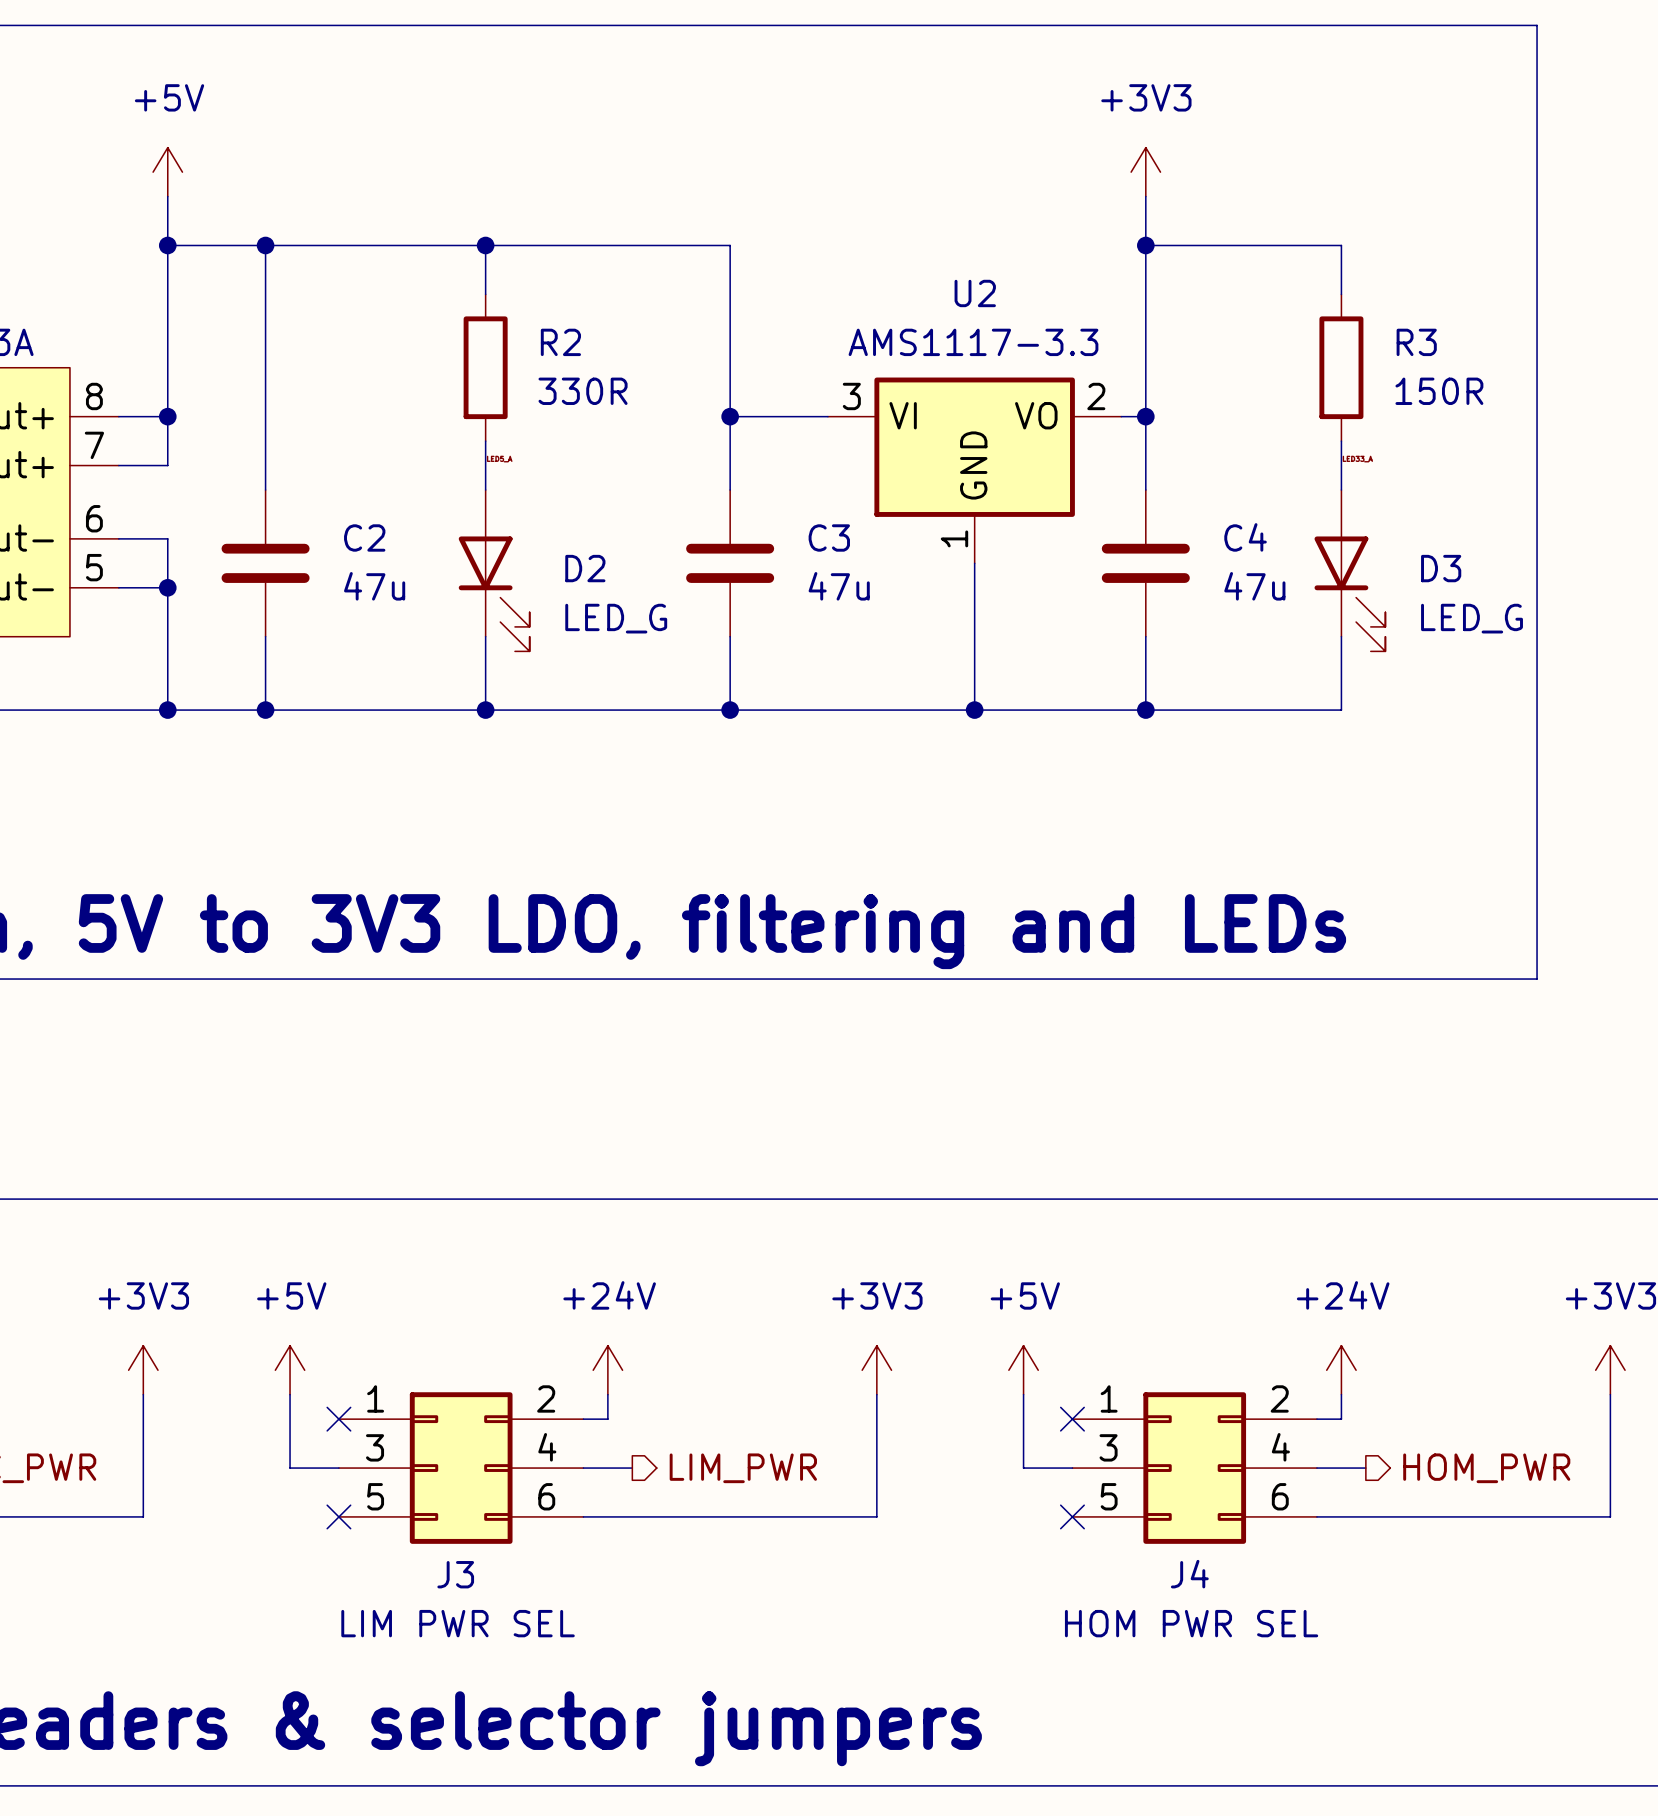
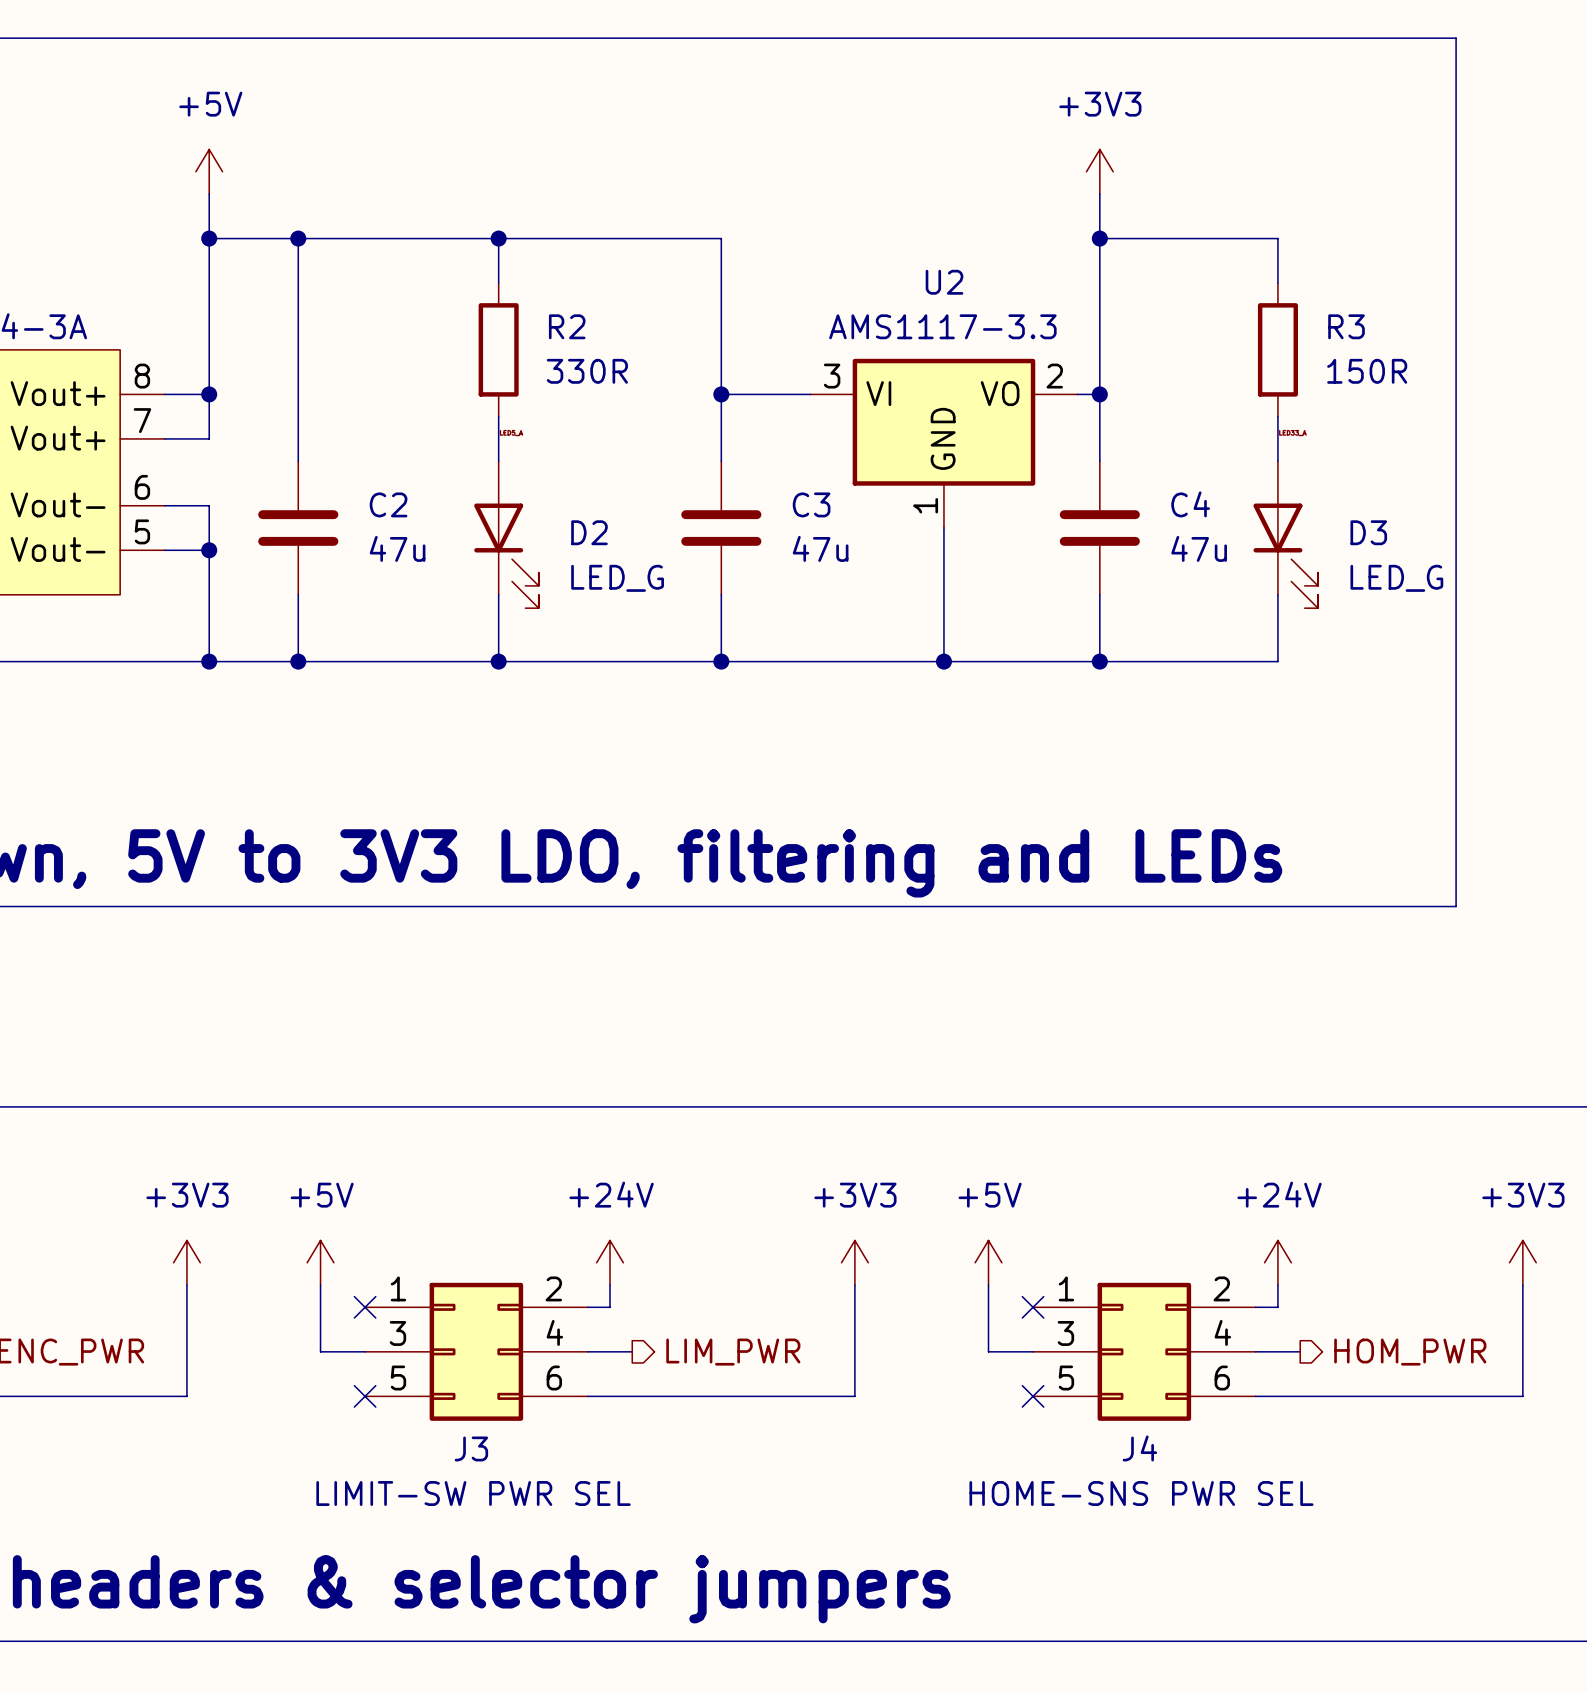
J3 value: LIM PWR SEL (458, 1623) -> LIMIT-SW PWR SEL (473, 1493)
J4 value: HOM PWR SEL (1191, 1623) -> HOME-SNS PWR SEL (1141, 1493)

